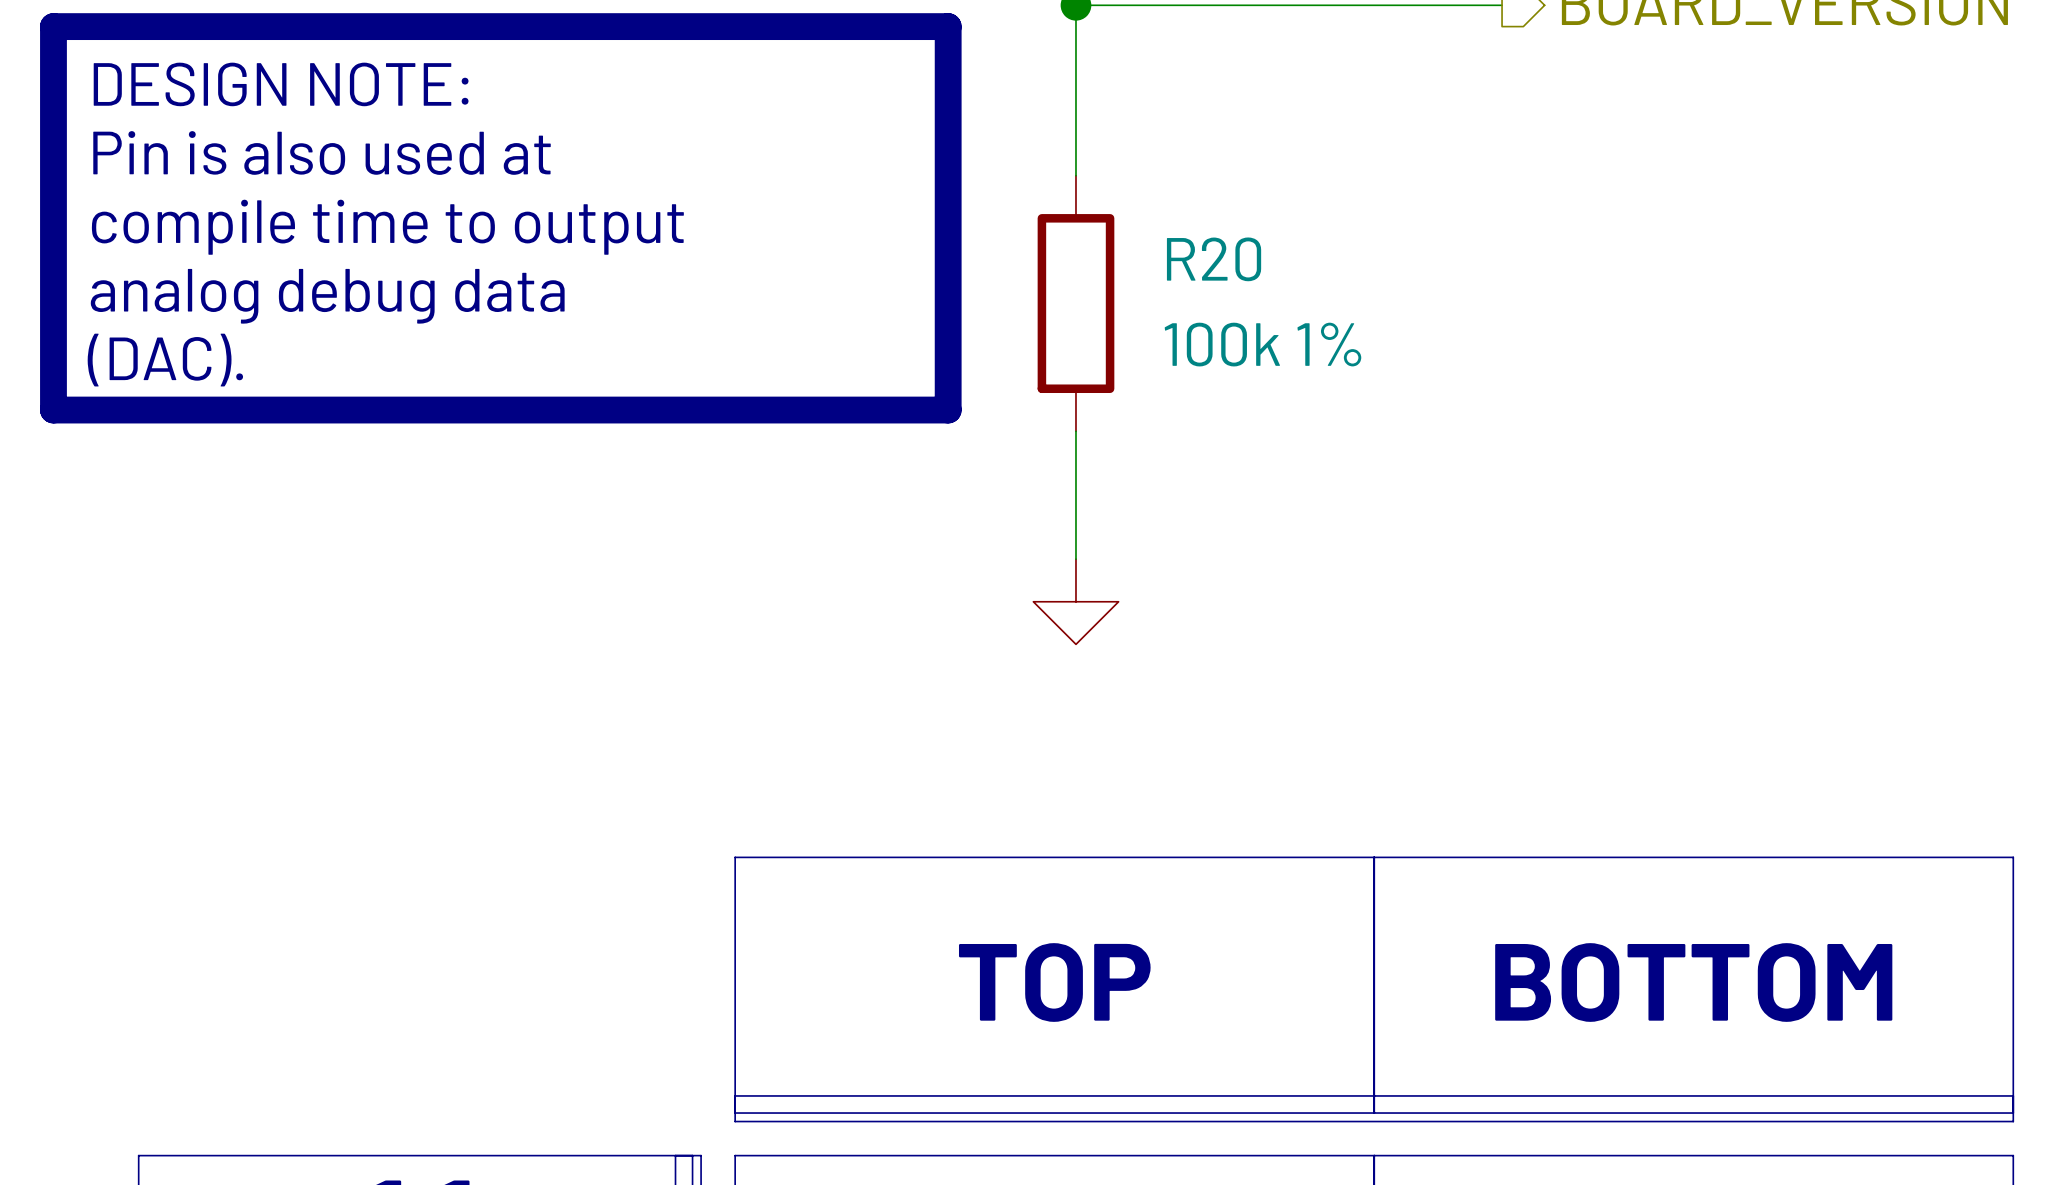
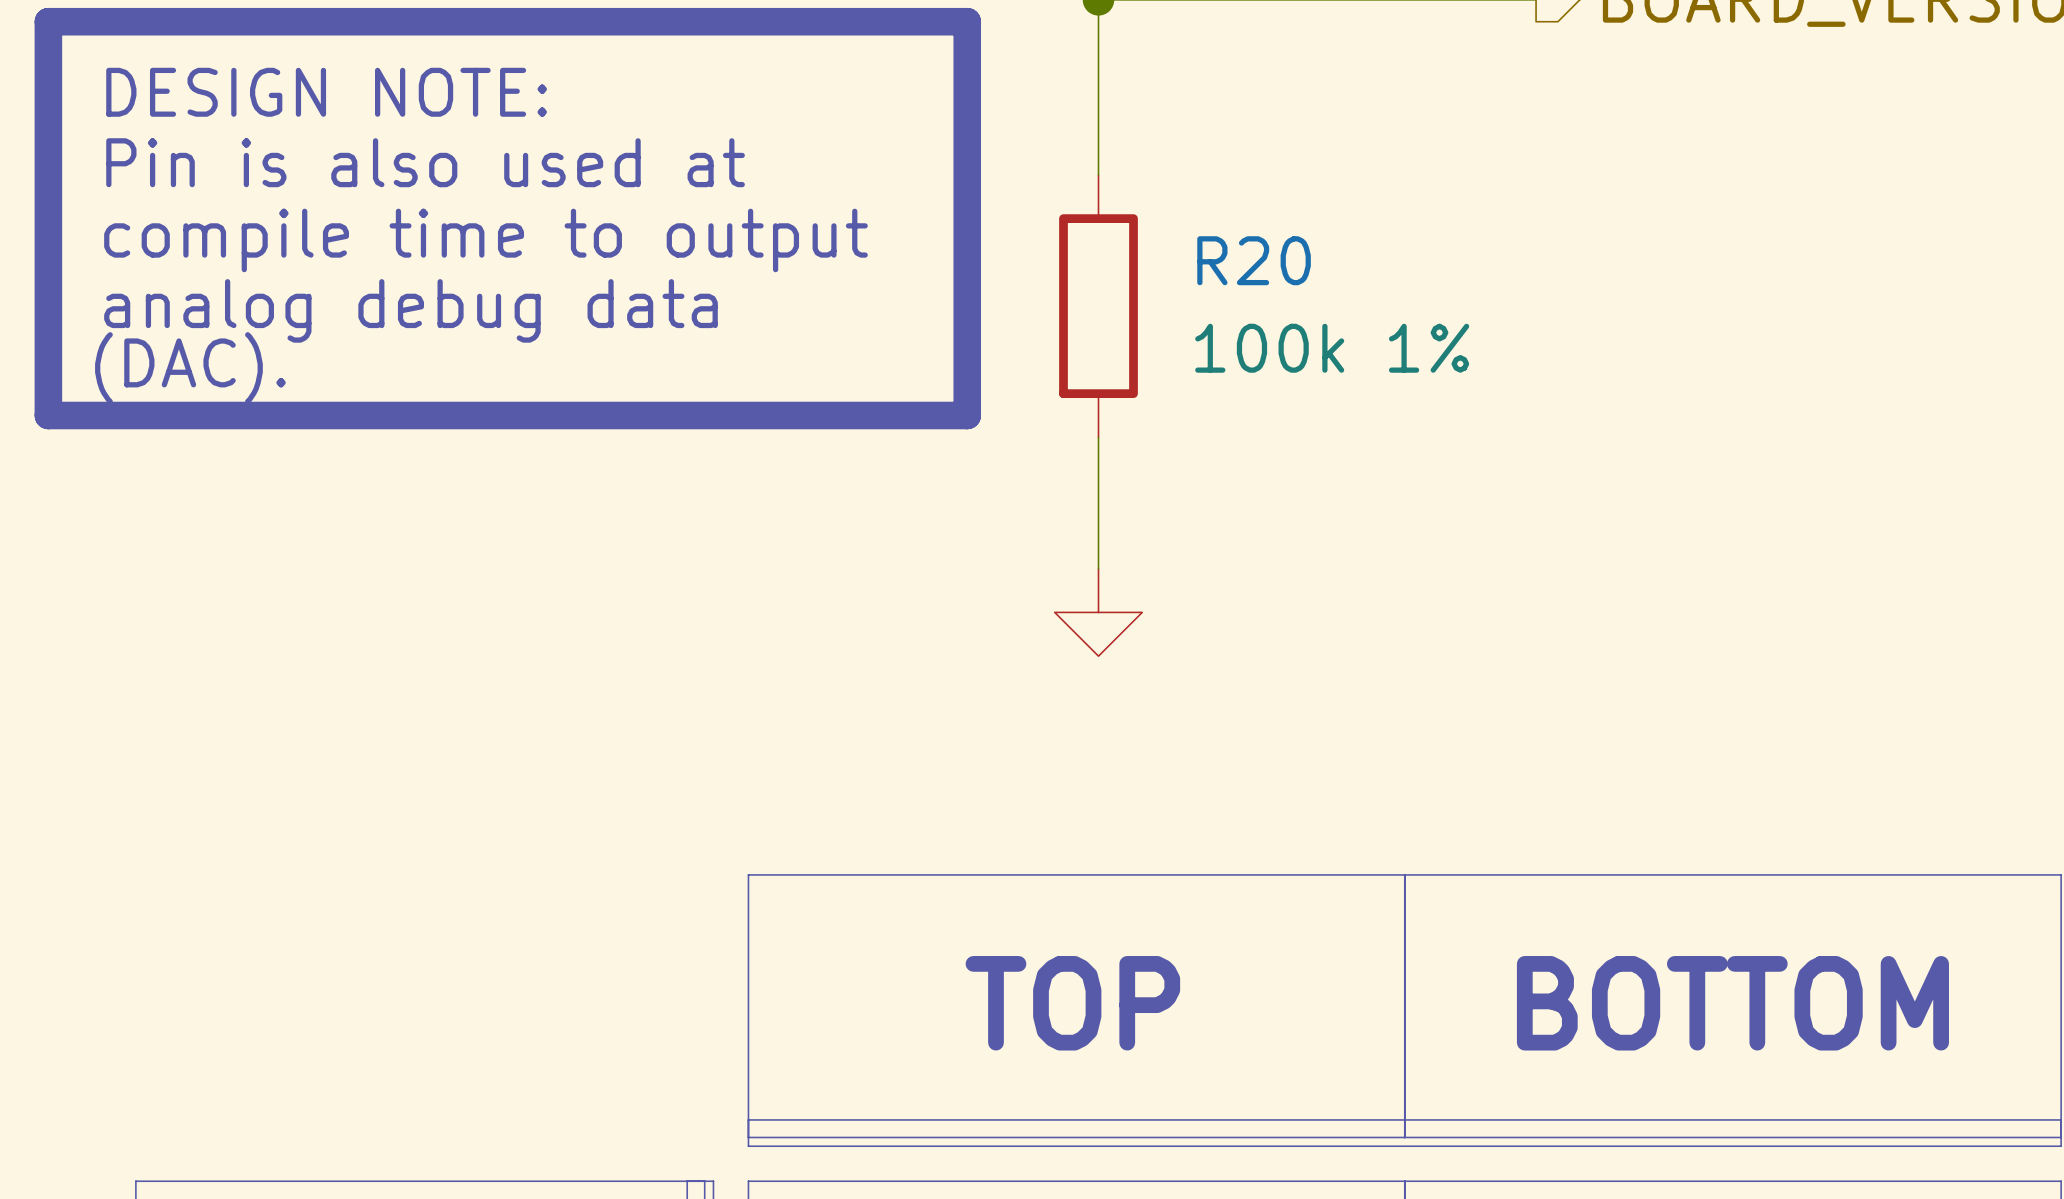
text position: DESIGN NOTE: (281, 84) -> DESIGN NOTE: (326, 92)
text position: Pin is also used at (322, 153) -> Pin is also used at (425, 162)
text position: compile time to output (387, 227) -> compile time to output (485, 240)
text position: analog debug data (327, 296) -> analog debug data (410, 310)

